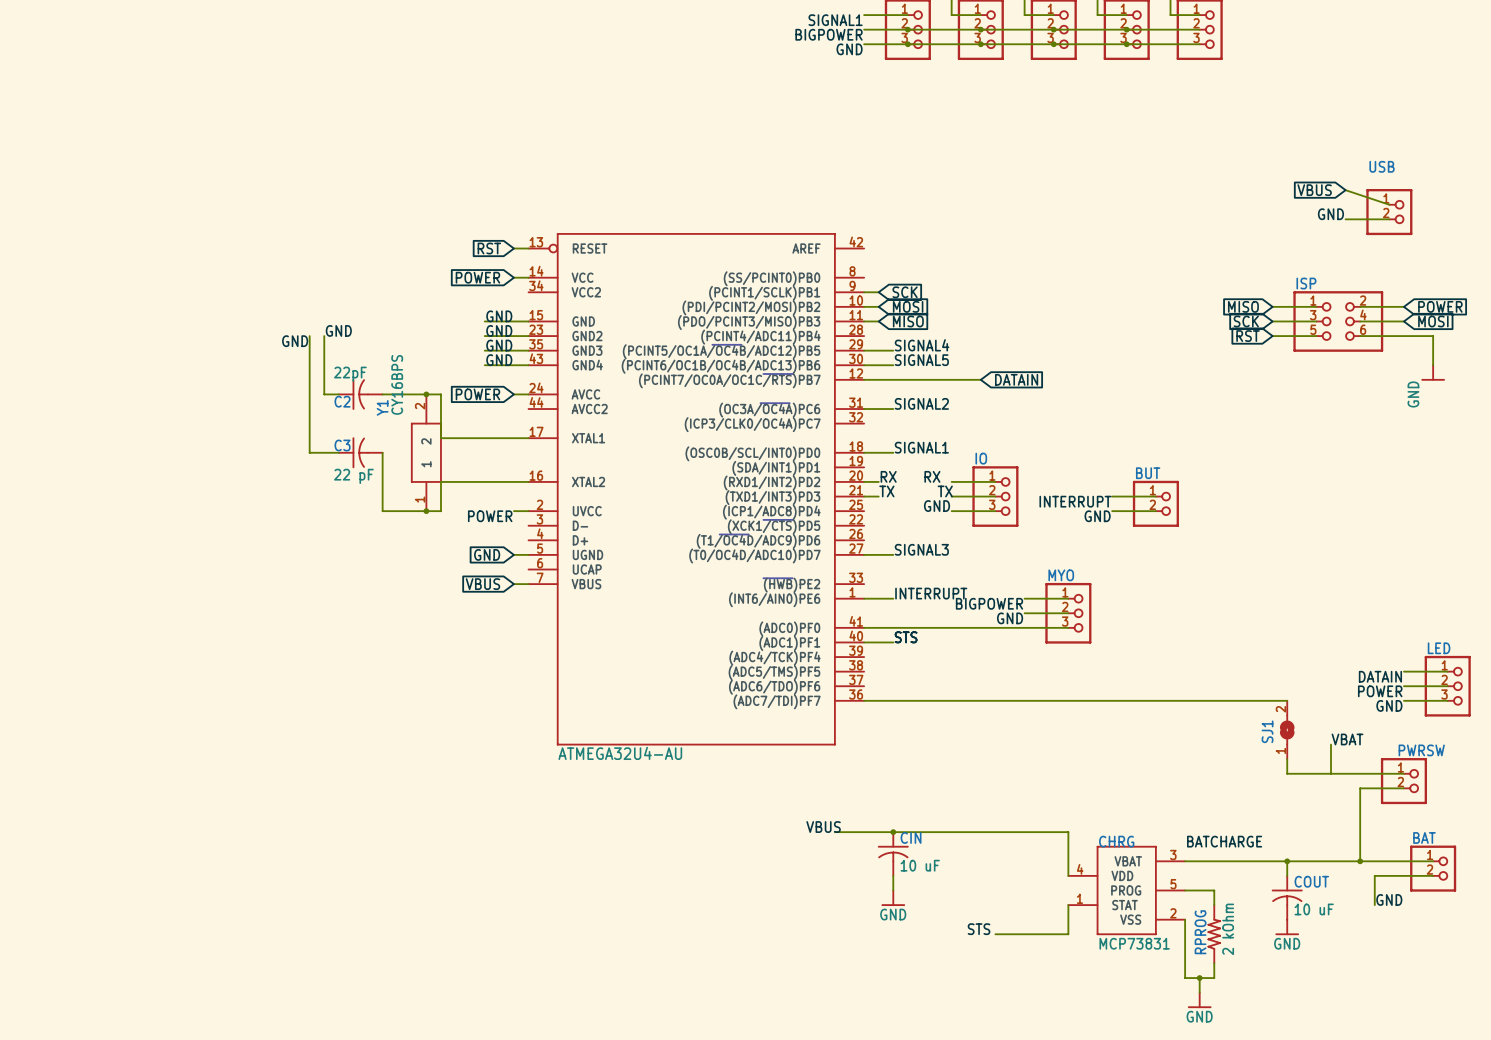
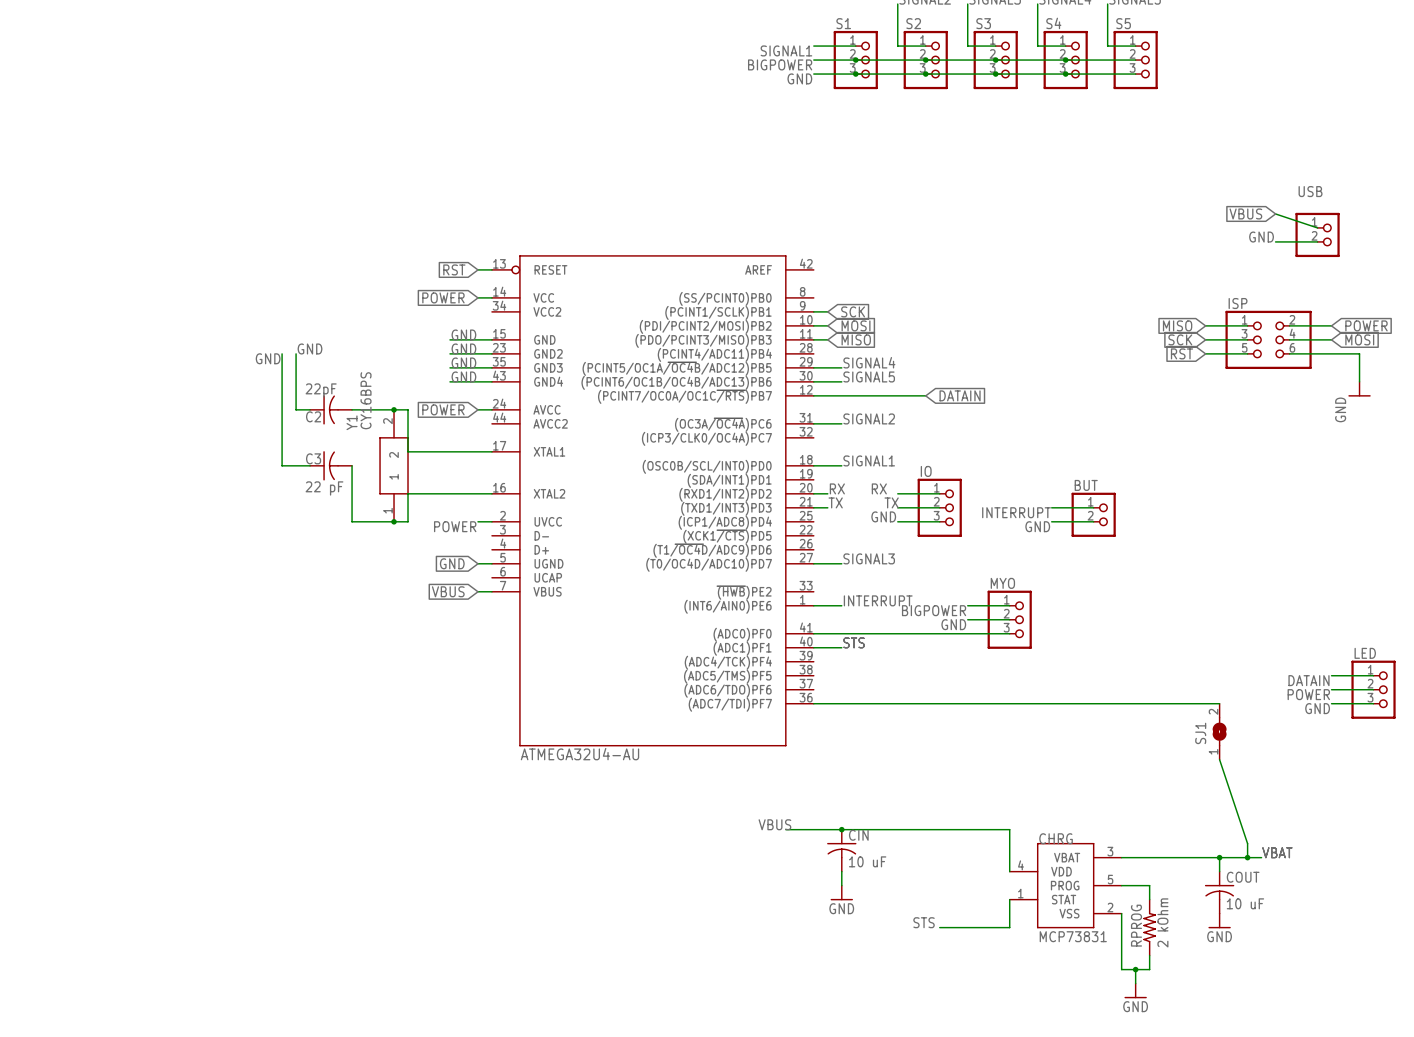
label position: VBAT (1347, 739) -> VBAT (1277, 852)
wire: (1331, 744) (1331, 773) -> none
wire: (1287, 759) (1287, 773) (1403, 773) -> (1219, 759) (1247, 843) (1247, 857)
PWRSW: (1403, 781) -> none
wire: (1403, 788) (1360, 788) (1360, 861) -> none
label: BATCHARGE (1224, 841) -> none
junction: none -> (1247, 857)
wire: (1331, 861) (1433, 861) -> none
junction: (1360, 861) -> none
BAT: (1433, 868) -> none
wire: (1433, 875) (1374, 875) (1374, 905) -> none
label: GND (1389, 899) -> none

